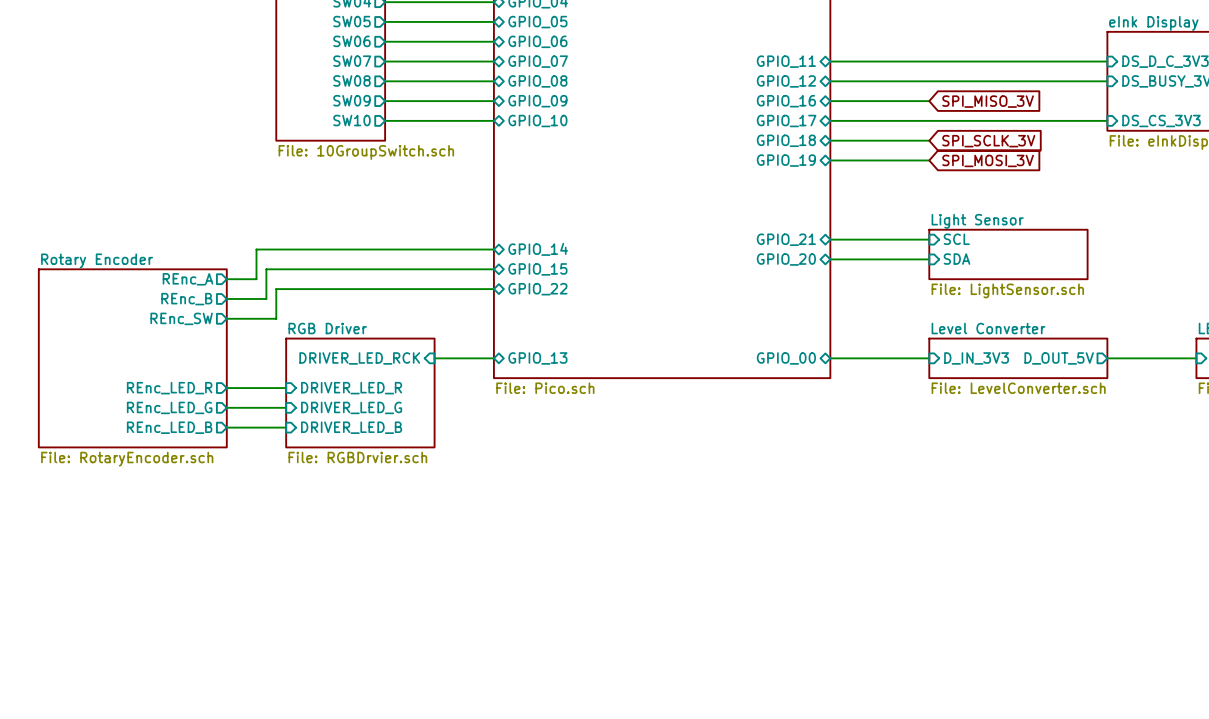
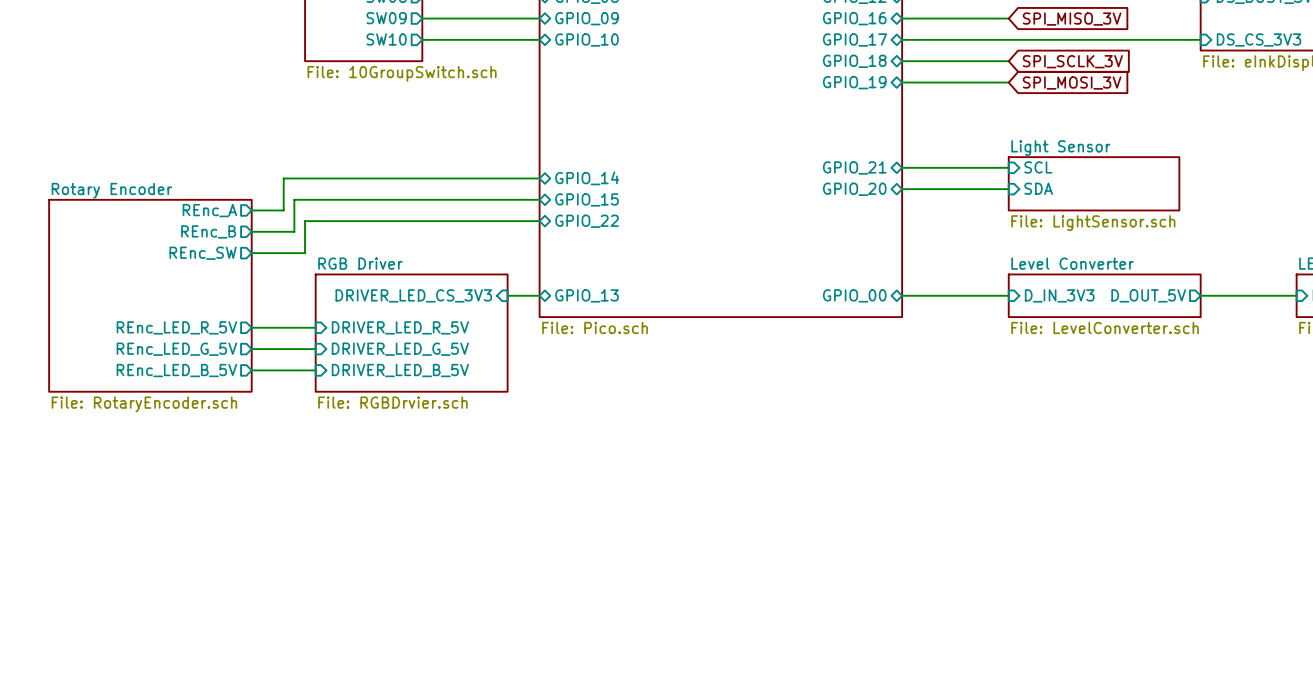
sheet pin: DRIVER_LED_RCK (359, 358) -> DRIVER_LED_CS_3V3 (413, 295)
wire: (434, 358) (464, 358) -> none
sheet pin: REnc_LED_R (169, 388) -> REnc_LED_R_5V (176, 327)
sheet pin: DRIVER_LED_R (351, 388) -> DRIVER_LED_R_5V (400, 327)
sheet RGB Driver: File: RGBDrvier.sch (360, 392) -> none
sheet RGB Driver: none -> File: RGBDrvier.sch (411, 333)
sheet pin: REnc_LED_G (169, 407) -> REnc_LED_G_5V (176, 349)
sheet pin: DRIVER_LED_G (351, 407) -> DRIVER_LED_G_5V (400, 349)
sheet pin: REnc_LED_B (169, 427) -> REnc_LED_B_5V (176, 370)
sheet pin: DRIVER_LED_B (351, 427) -> DRIVER_LED_B_5V (400, 370)

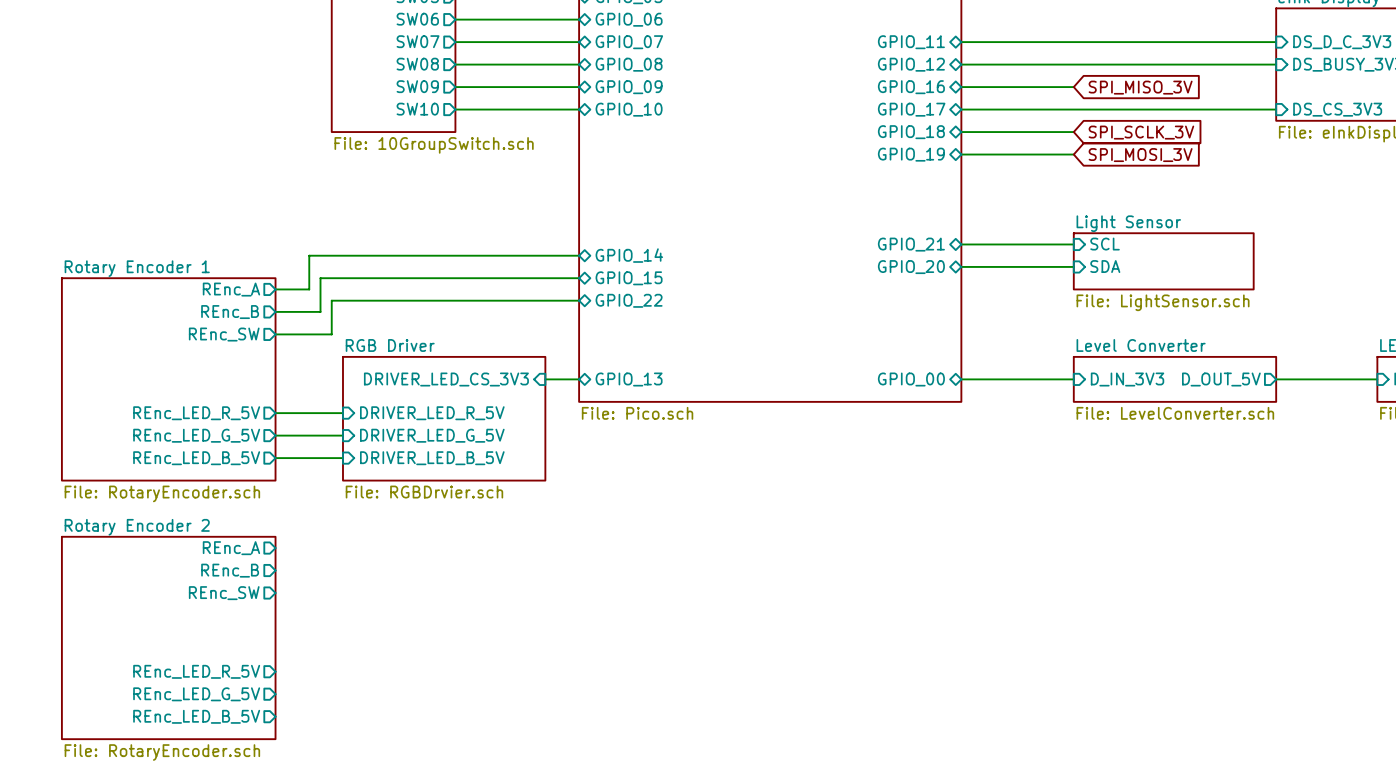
sheet Rotary Encoder name: Rotary Encoder (111, 190) -> Rotary Encoder 1 (137, 268)
sheet pin: none -> REnc_A (231, 548)
sheet pin: none -> REnc_B (230, 570)
sheet pin: none -> REnc_SW (224, 593)
sheet Rotary Encoder 2: none -> File: RotaryEncoder.sch (168, 637)
sheet pin: none -> REnc_LED_R_5V (196, 671)
sheet pin: none -> REnc_LED_G_5V (196, 694)
sheet pin: none -> REnc_LED_B_5V (196, 716)

